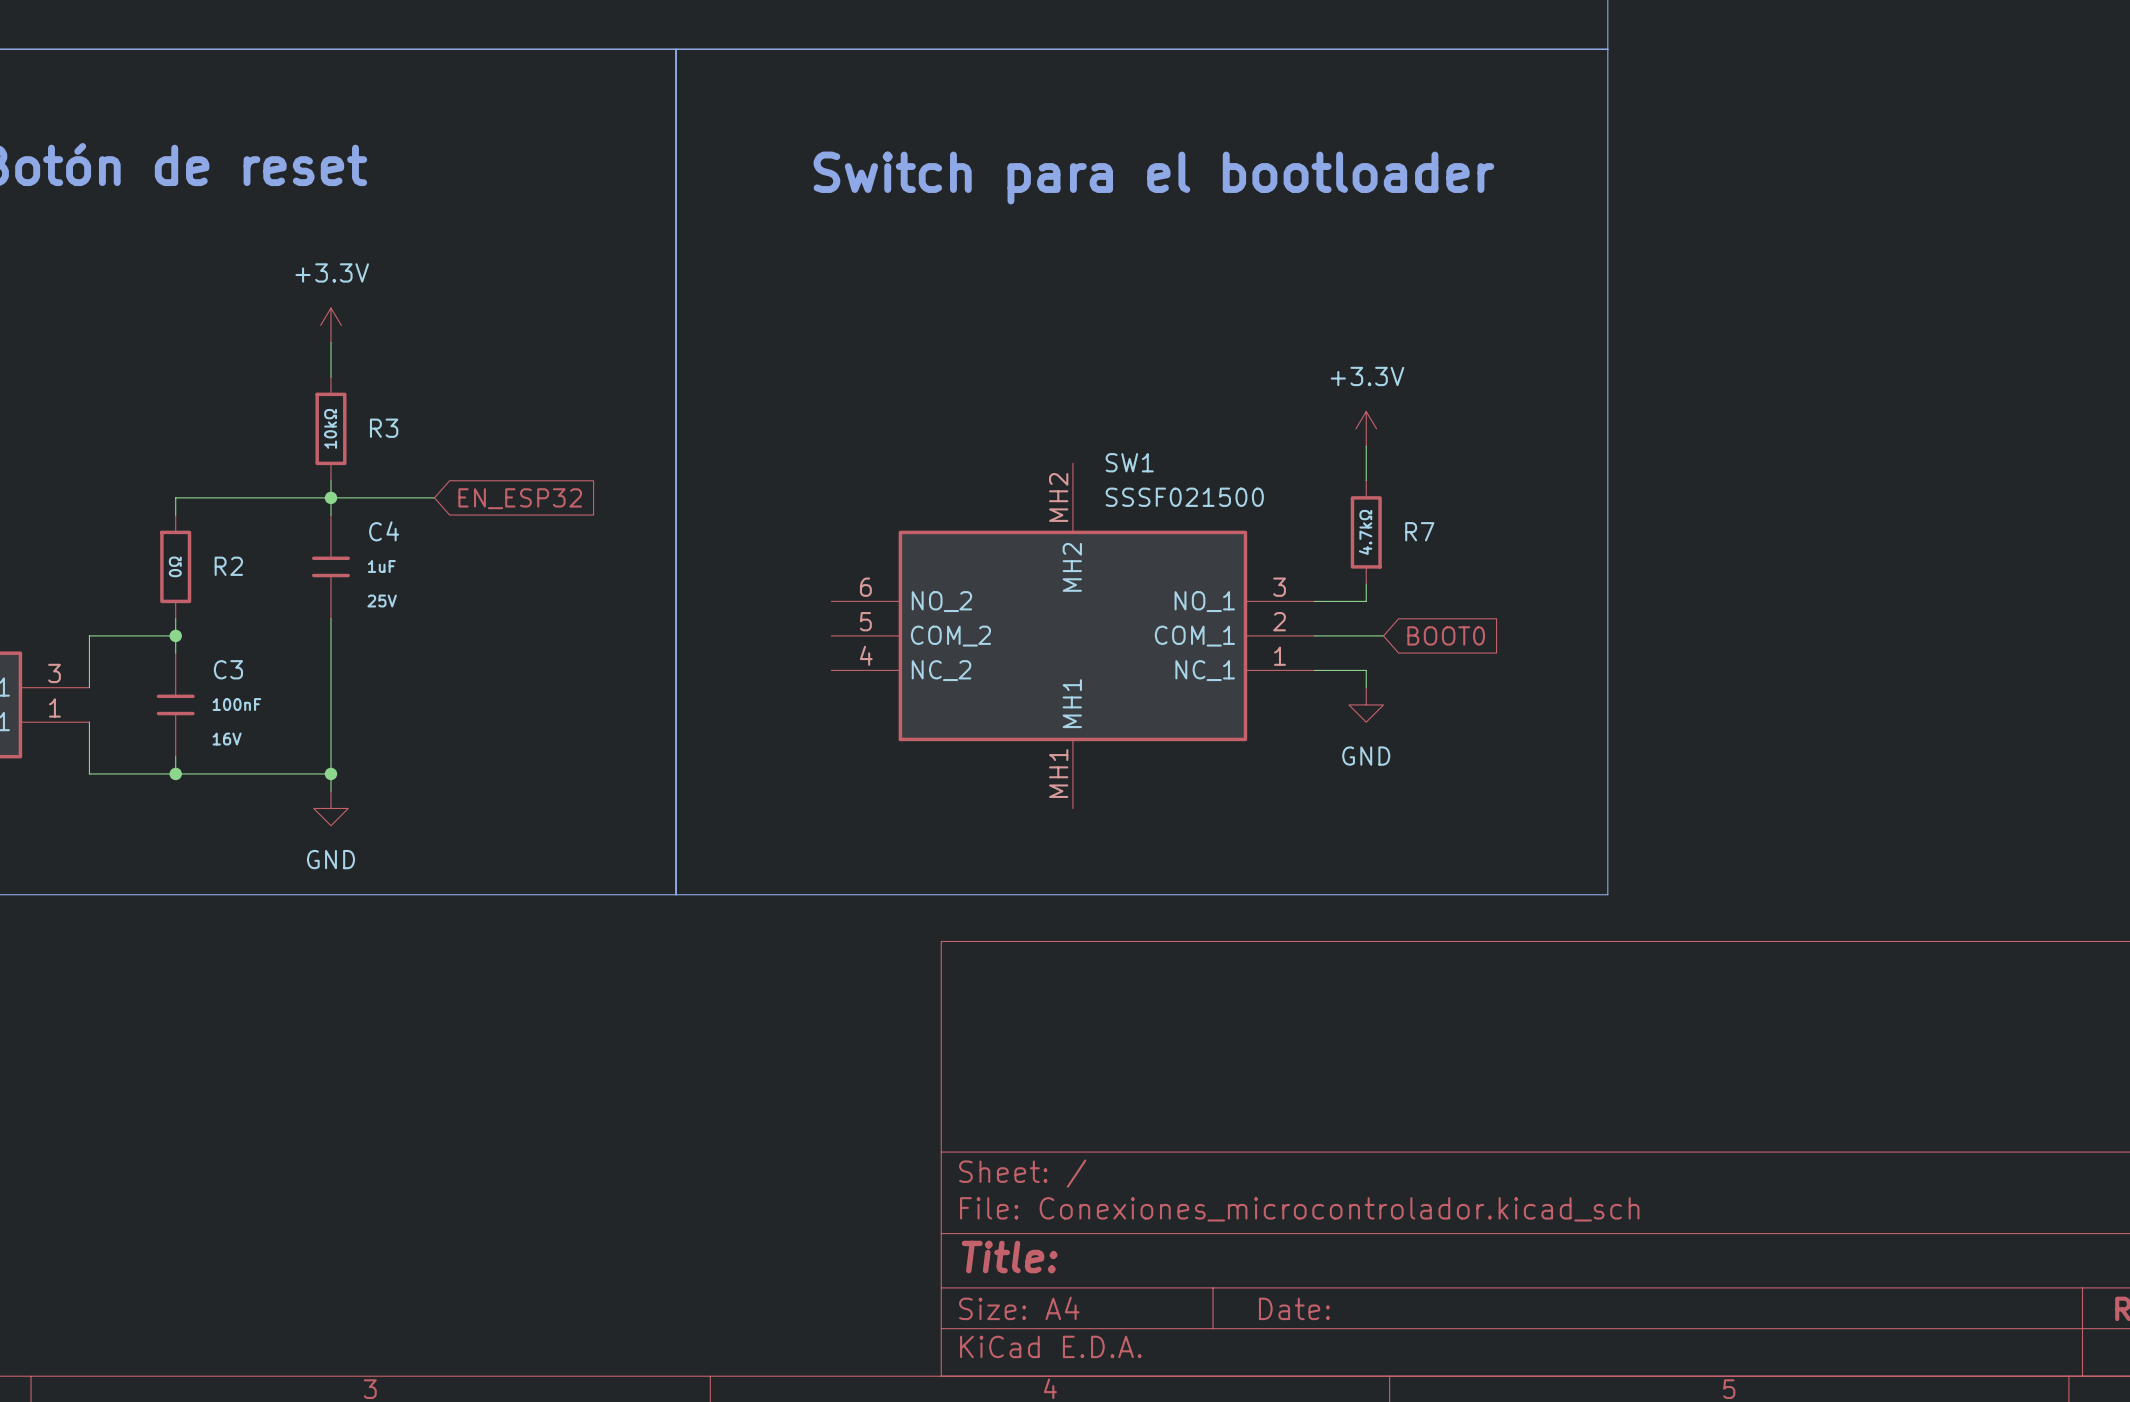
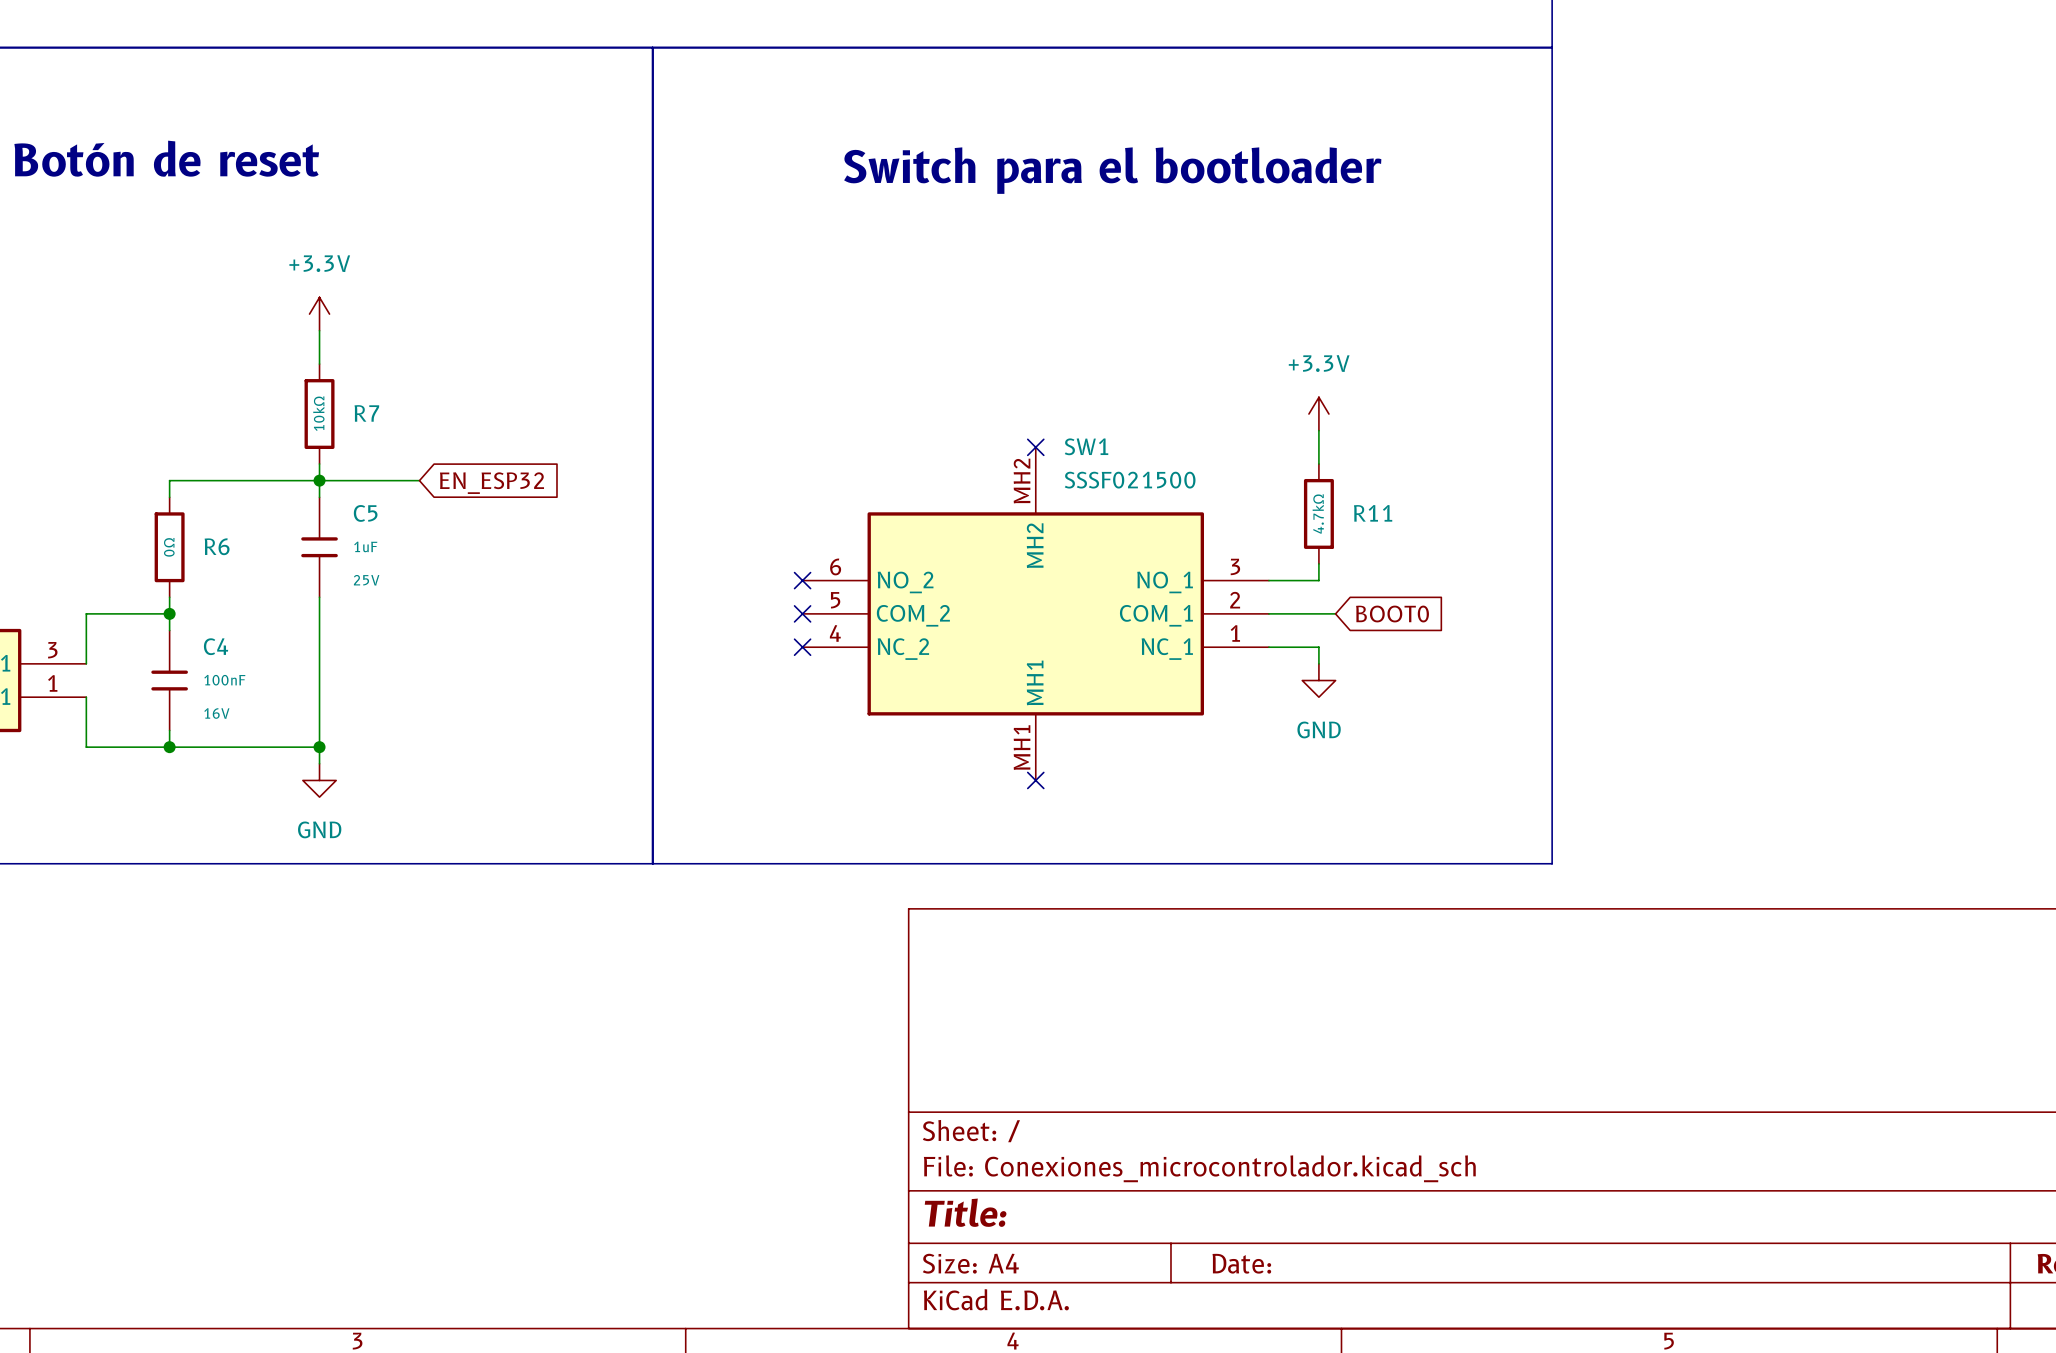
R3 name: R3 (384, 428) -> R7 (366, 413)
no-connect mark: none -> (1035, 447)
C4 name: C4 (384, 531) -> C5 (365, 513)
R7 name: R7 (1419, 531) -> R11 (1373, 513)
R2 name: R2 (228, 566) -> R6 (217, 546)
no-connect mark: none -> (802, 580)
no-connect mark: none -> (802, 613)
C3 name: C3 (228, 669) -> C4 (216, 646)
no-connect mark: none -> (802, 647)
no-connect mark: none -> (1035, 780)

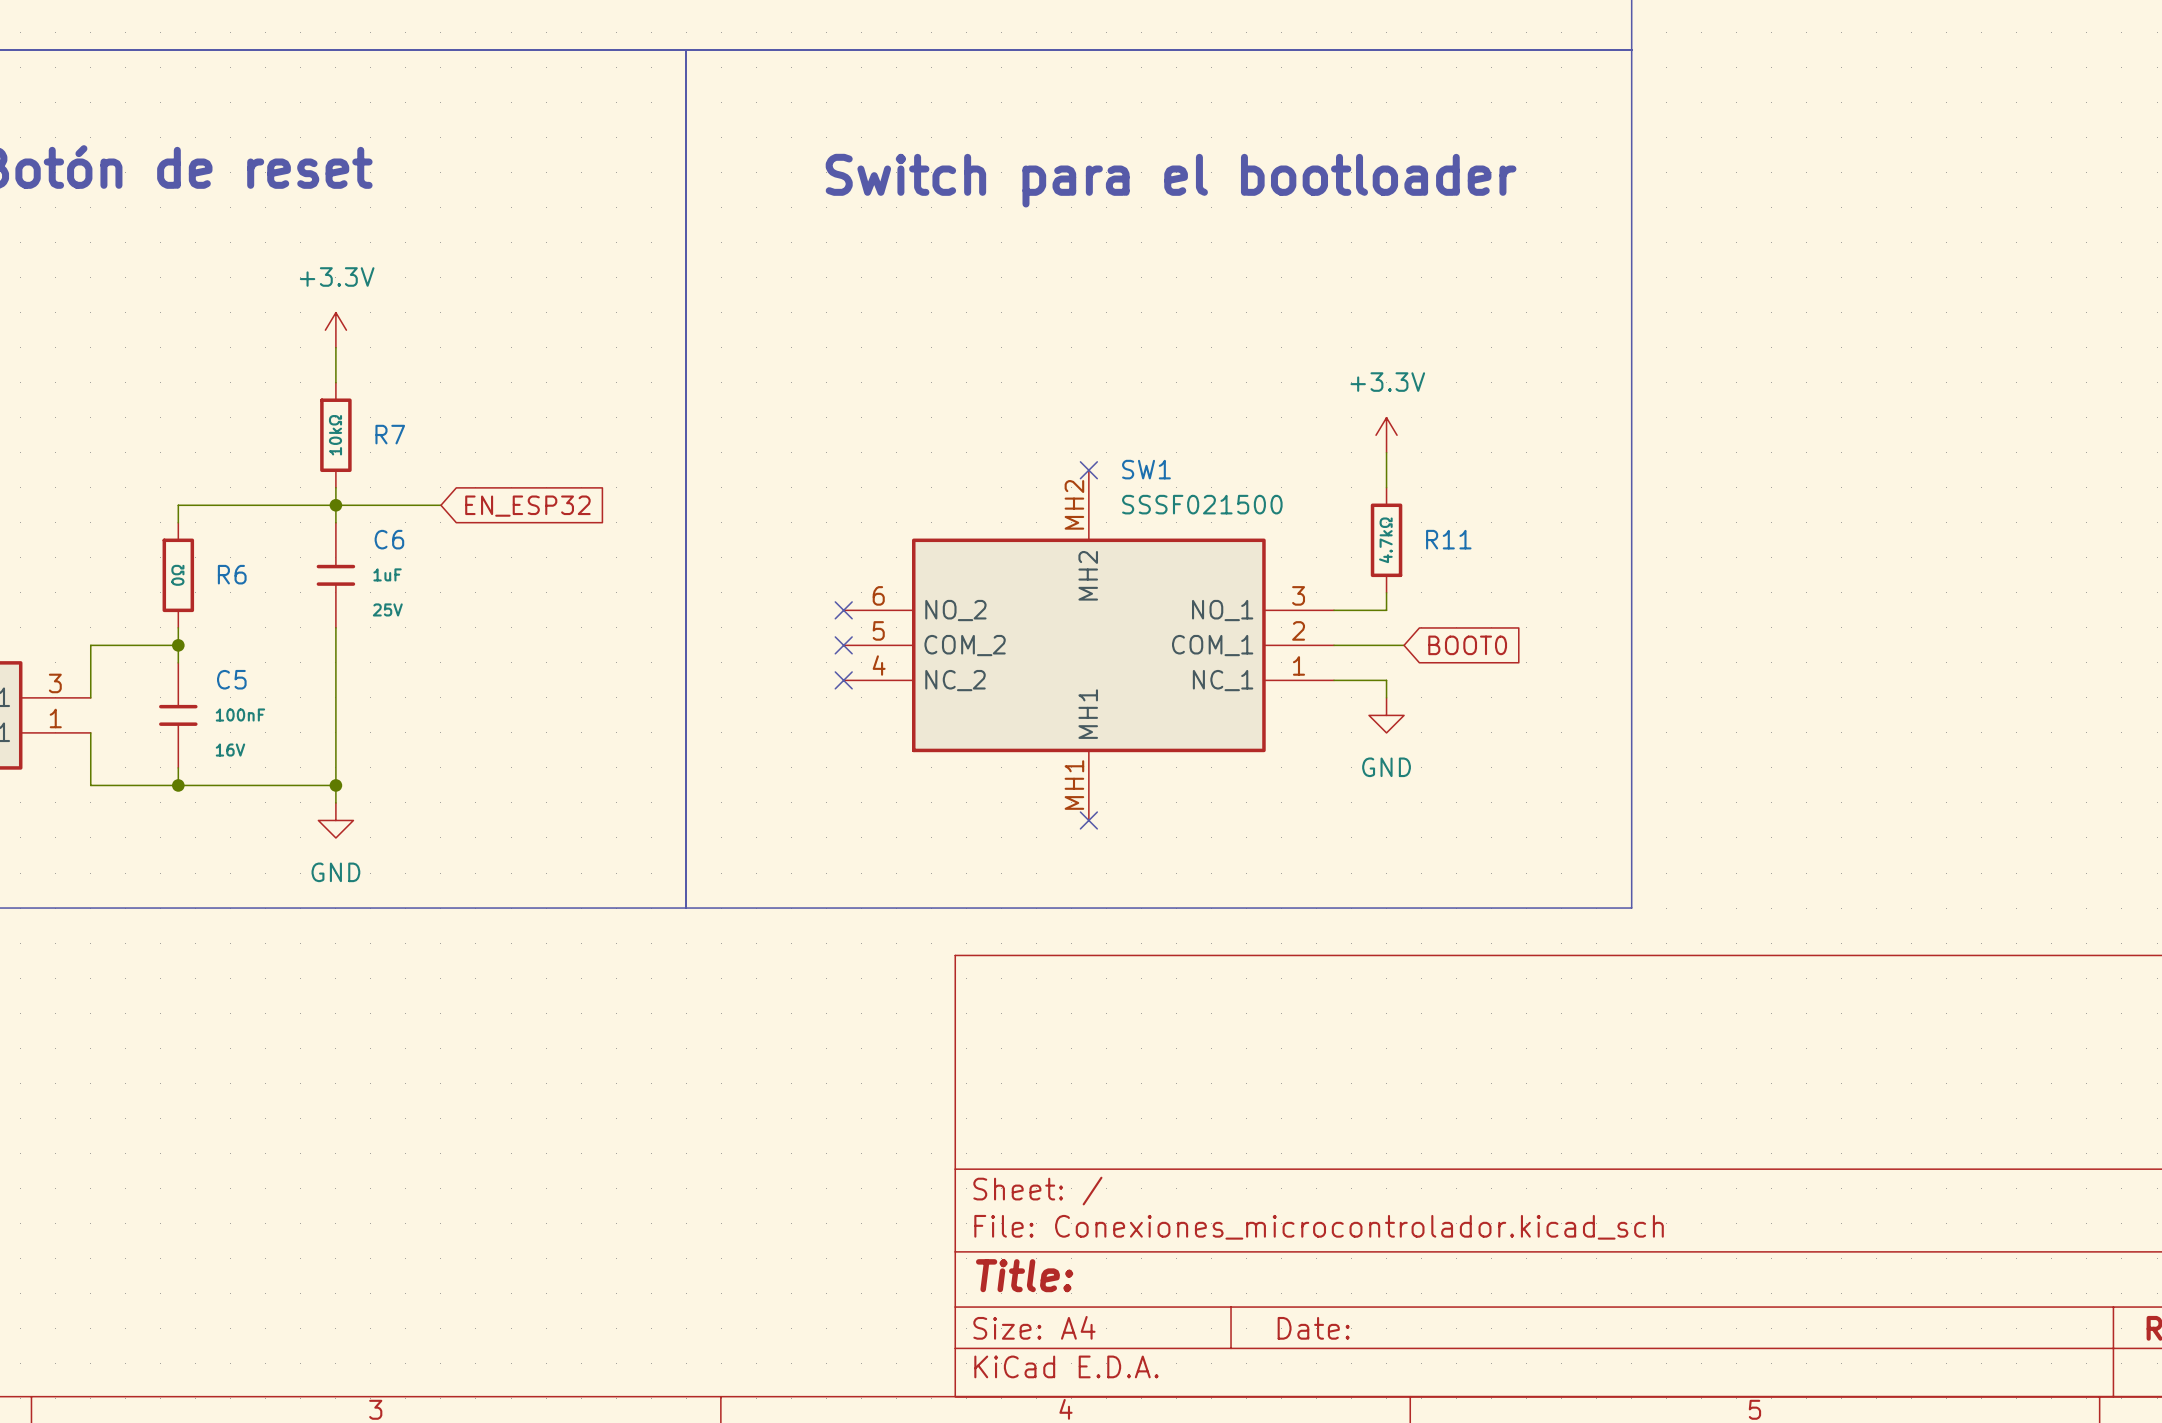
C5 name: C5 (365, 513) -> C6 (389, 539)
C4 name: C4 (216, 646) -> C5 (231, 679)

